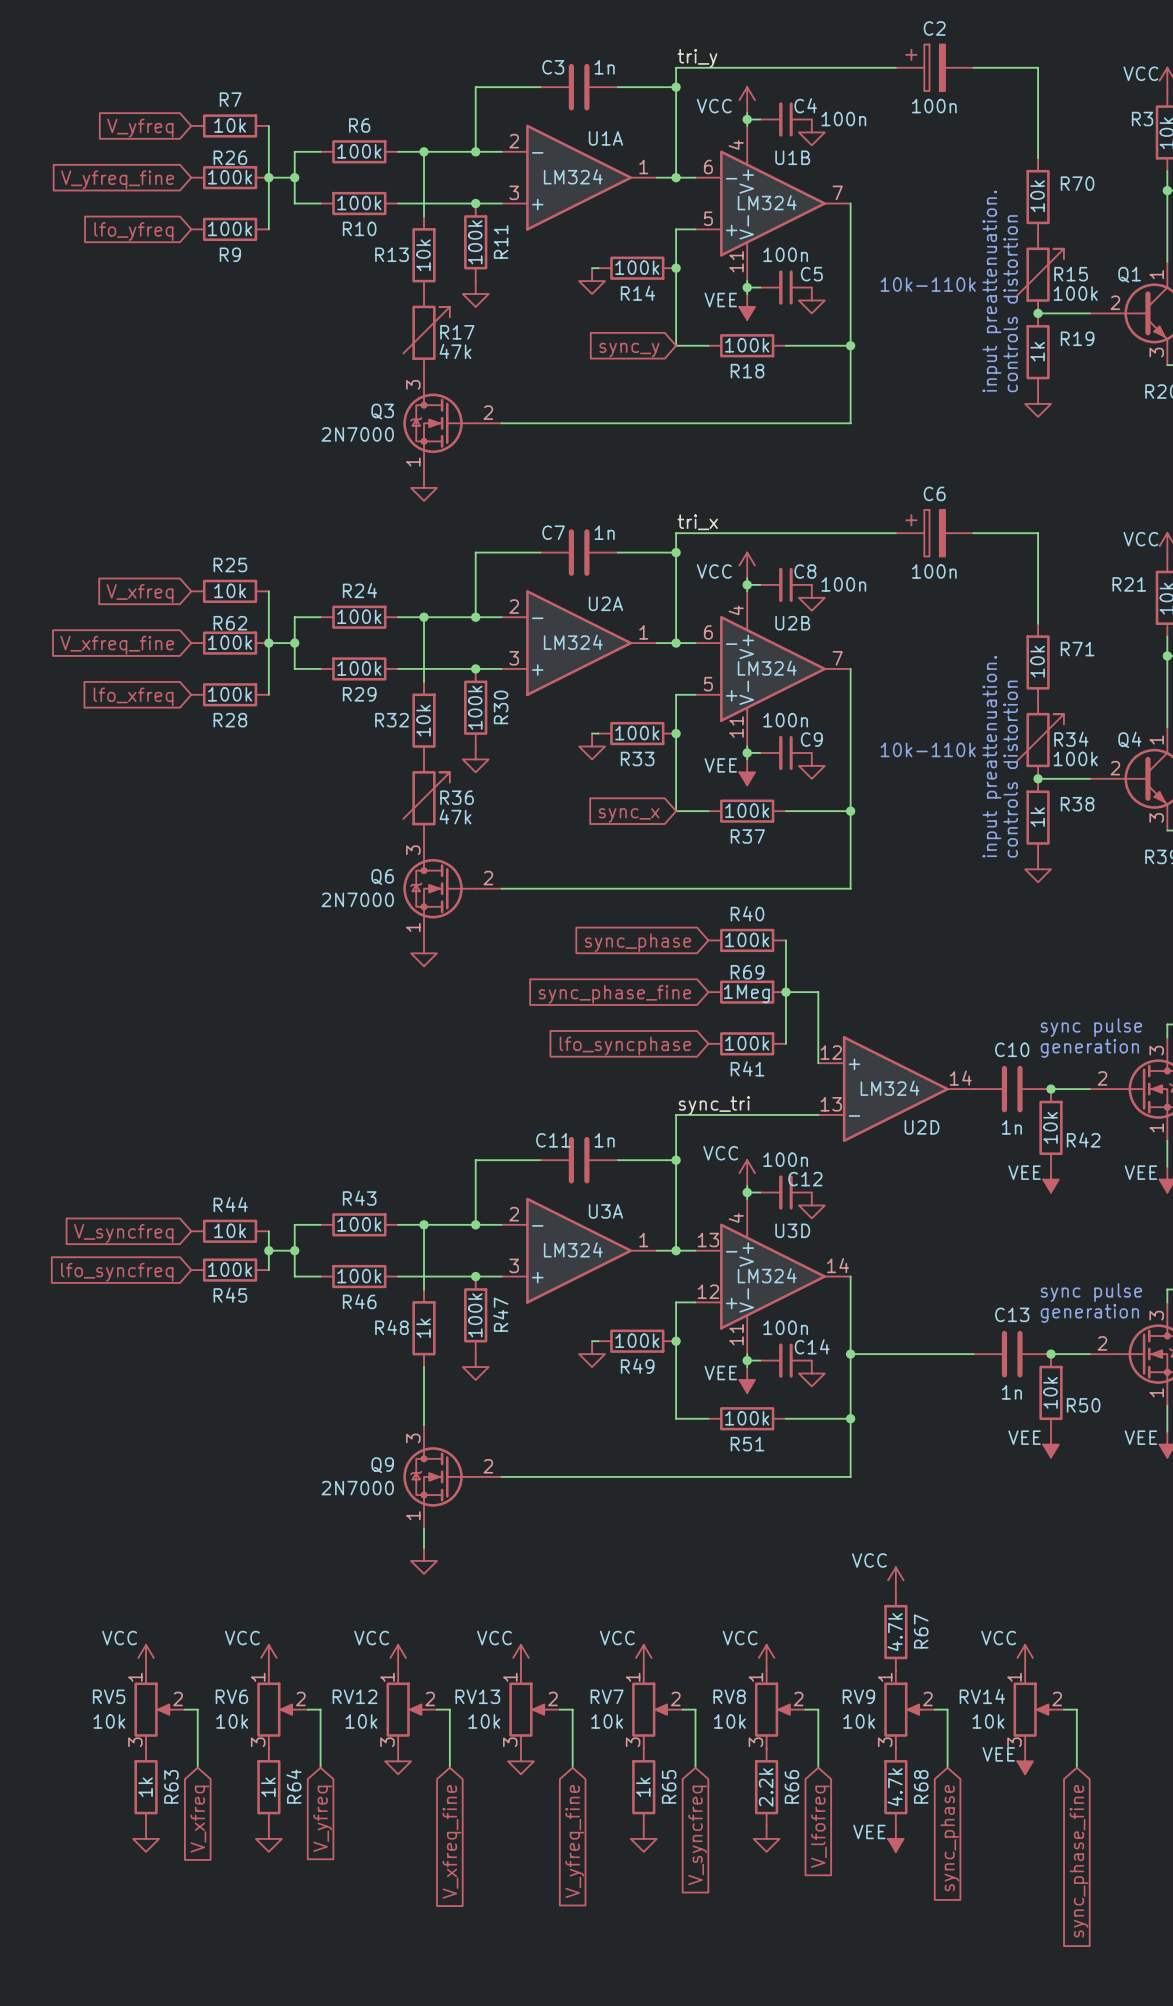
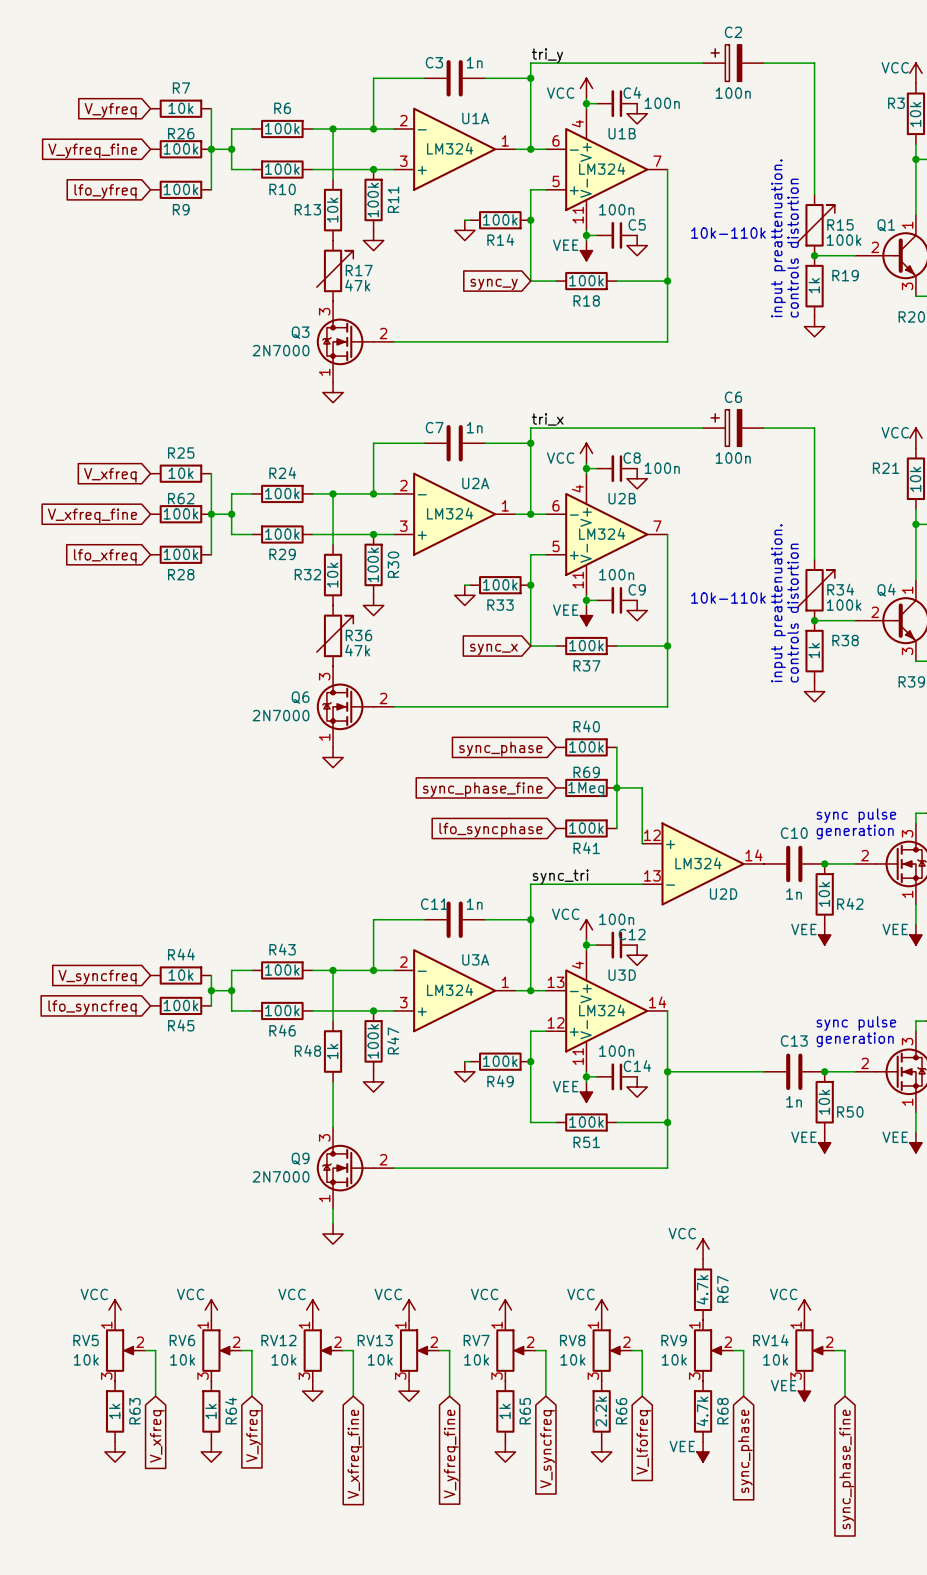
wire: none -> (814, 134) (814, 194)
R70: 10k (1038, 197) -> none
wire: none -> (814, 499) (814, 559)
R71: 10k (1038, 662) -> none

